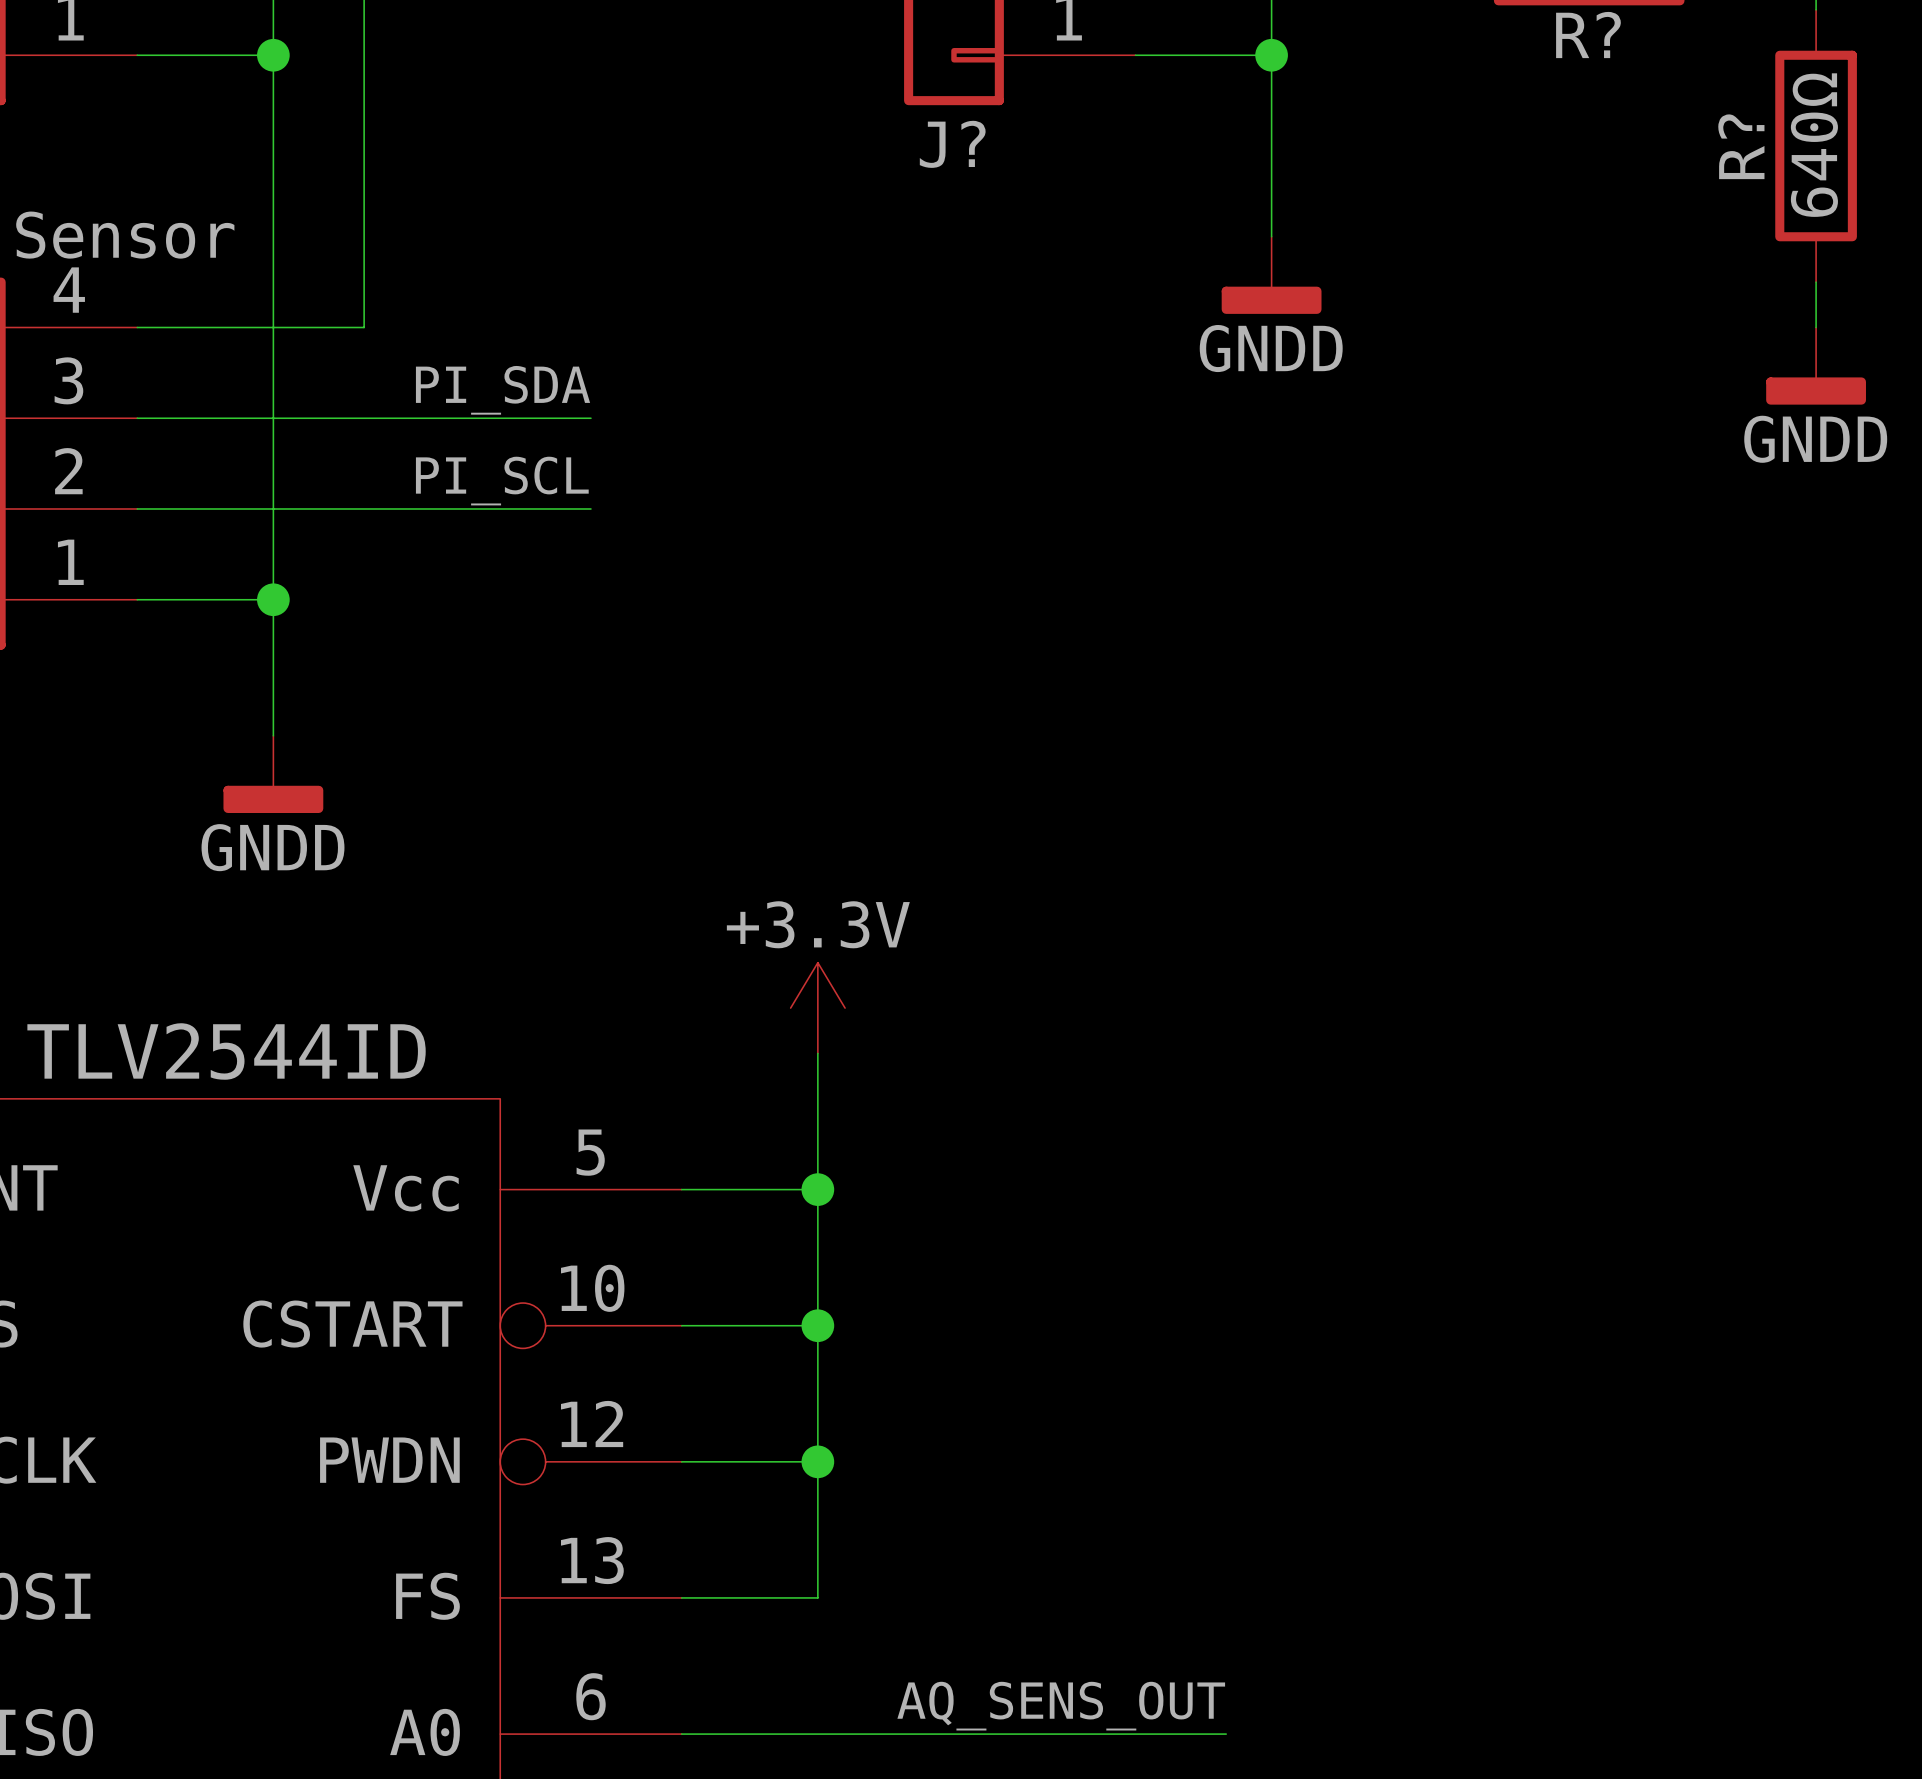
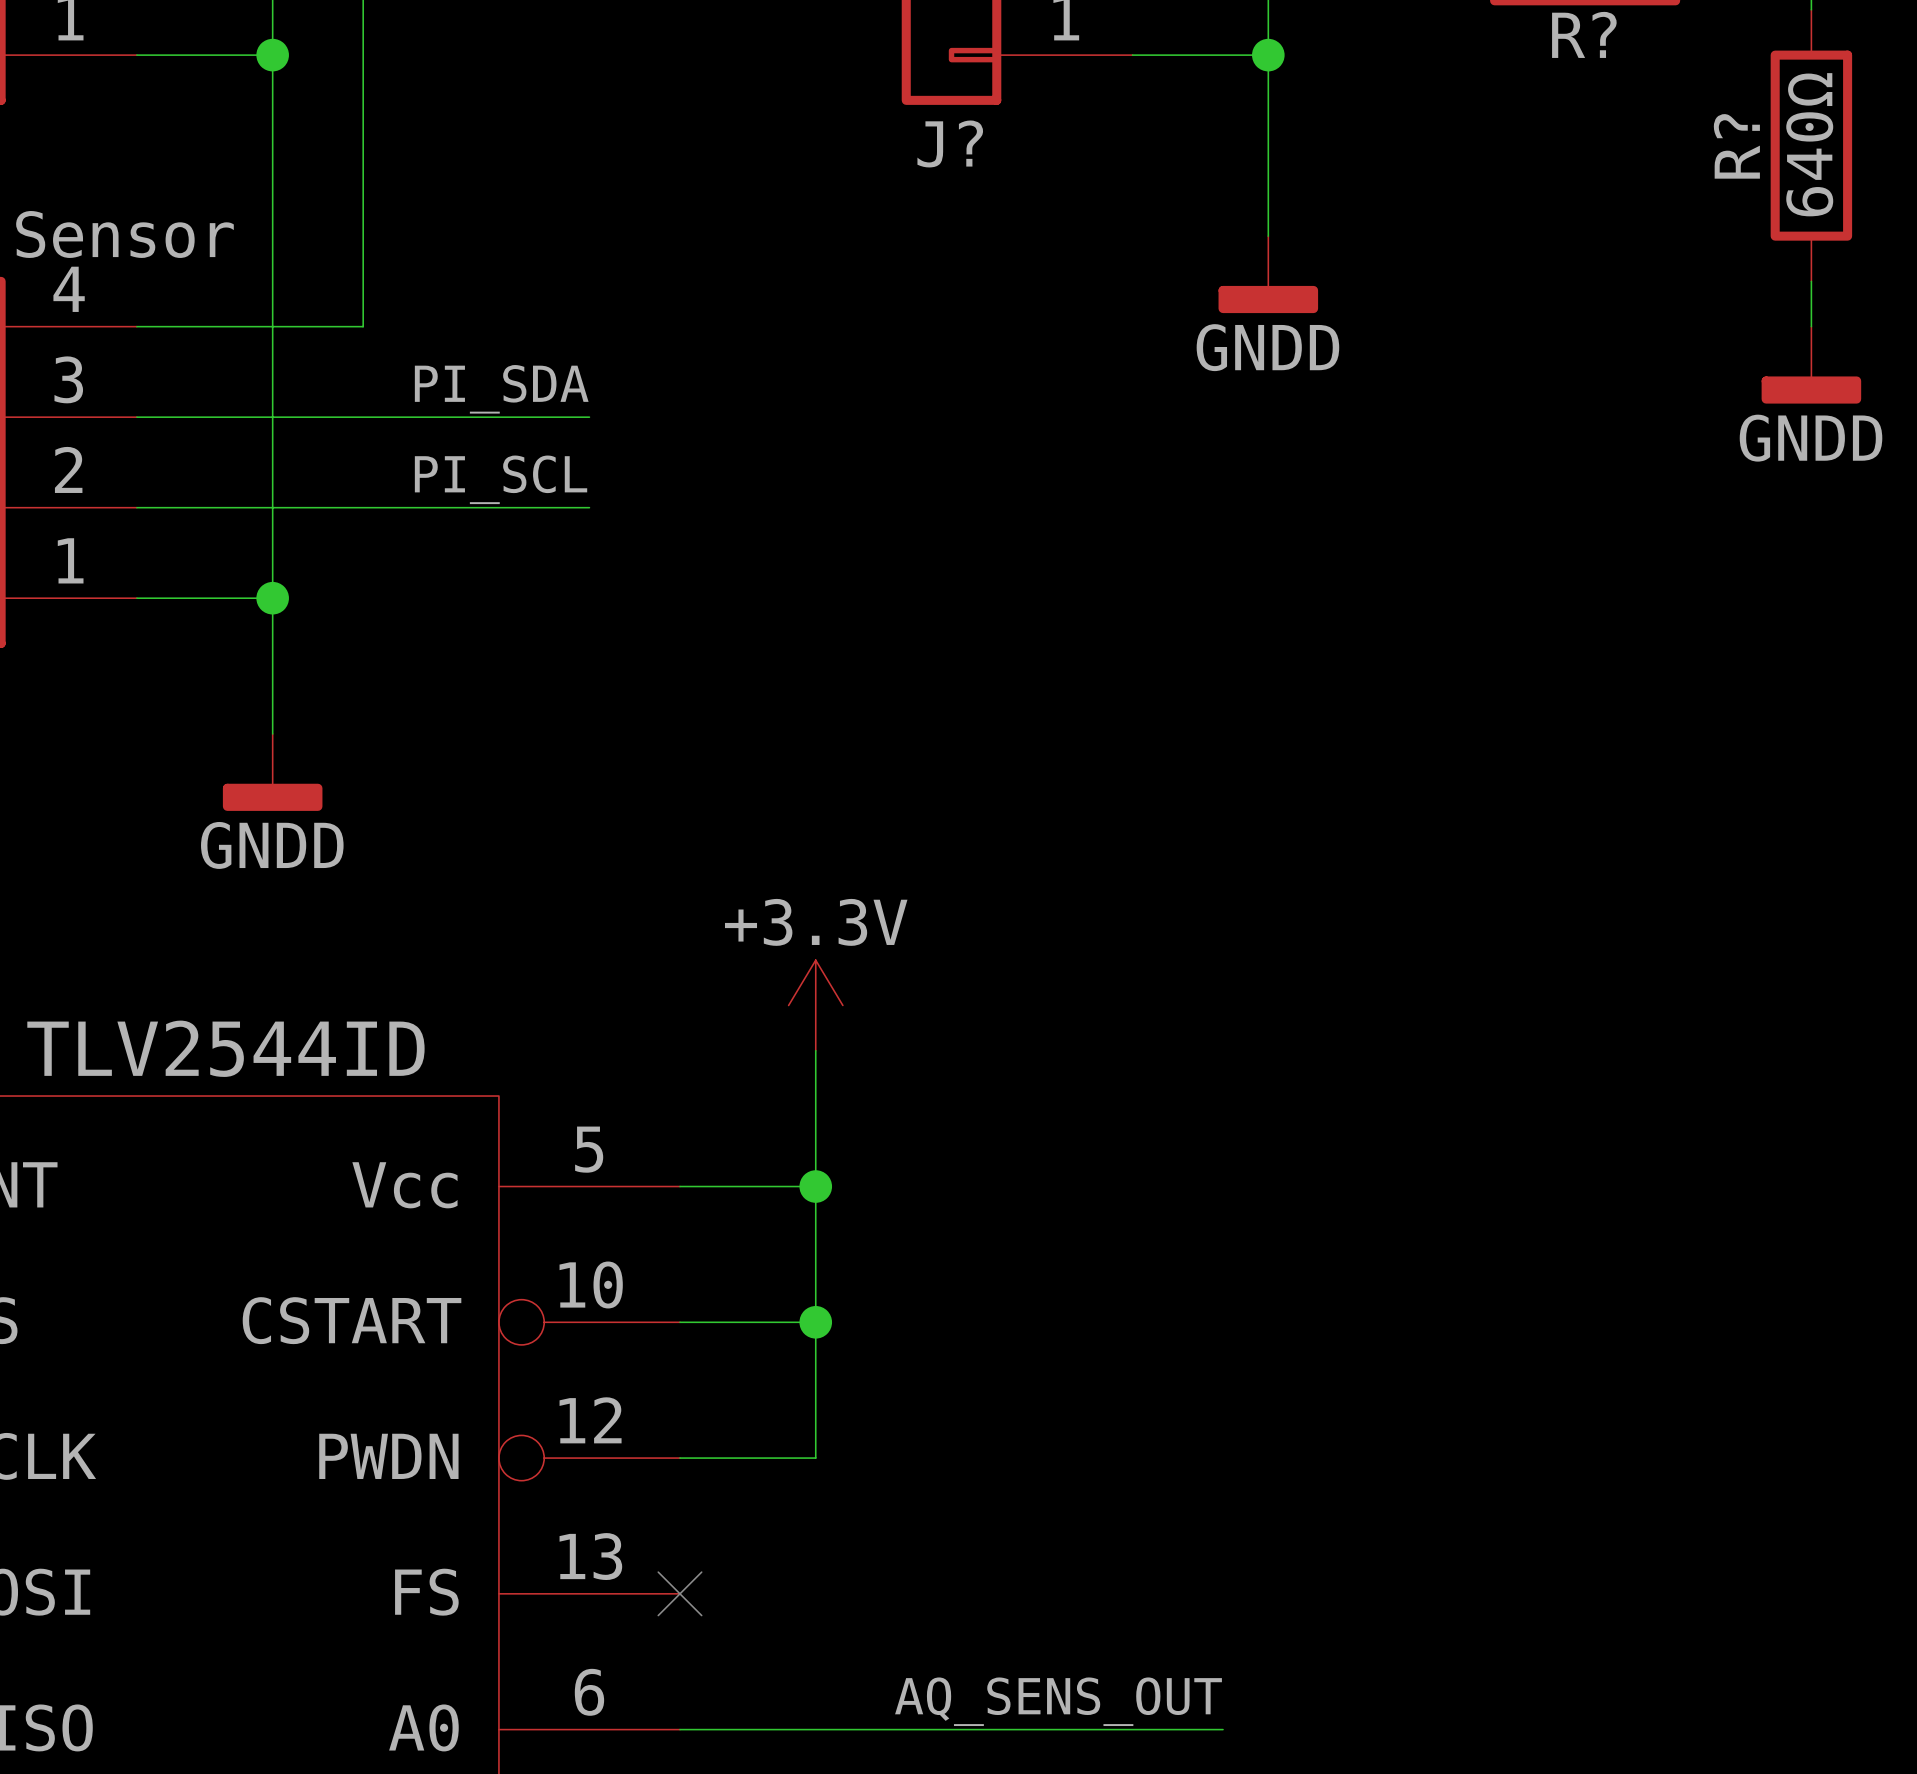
wire: (817, 1461) (817, 1597) (681, 1597) -> none
junction: (817, 1461) -> none
no-connect mark: none -> (679, 1593)

